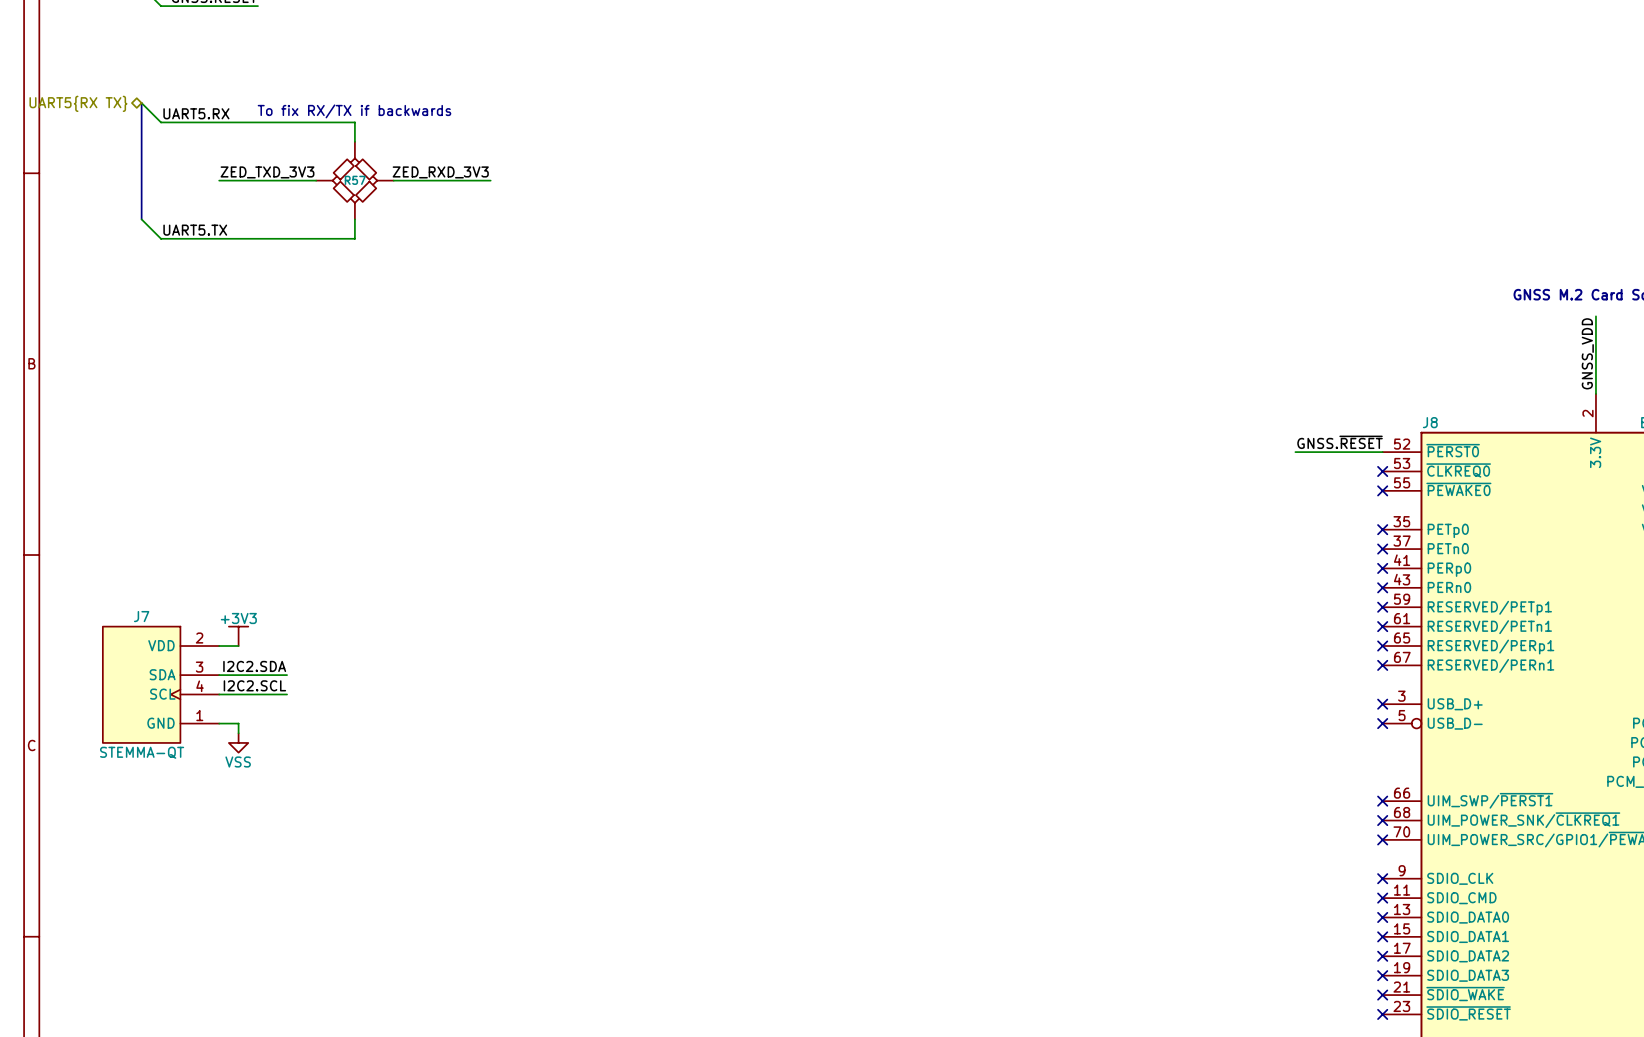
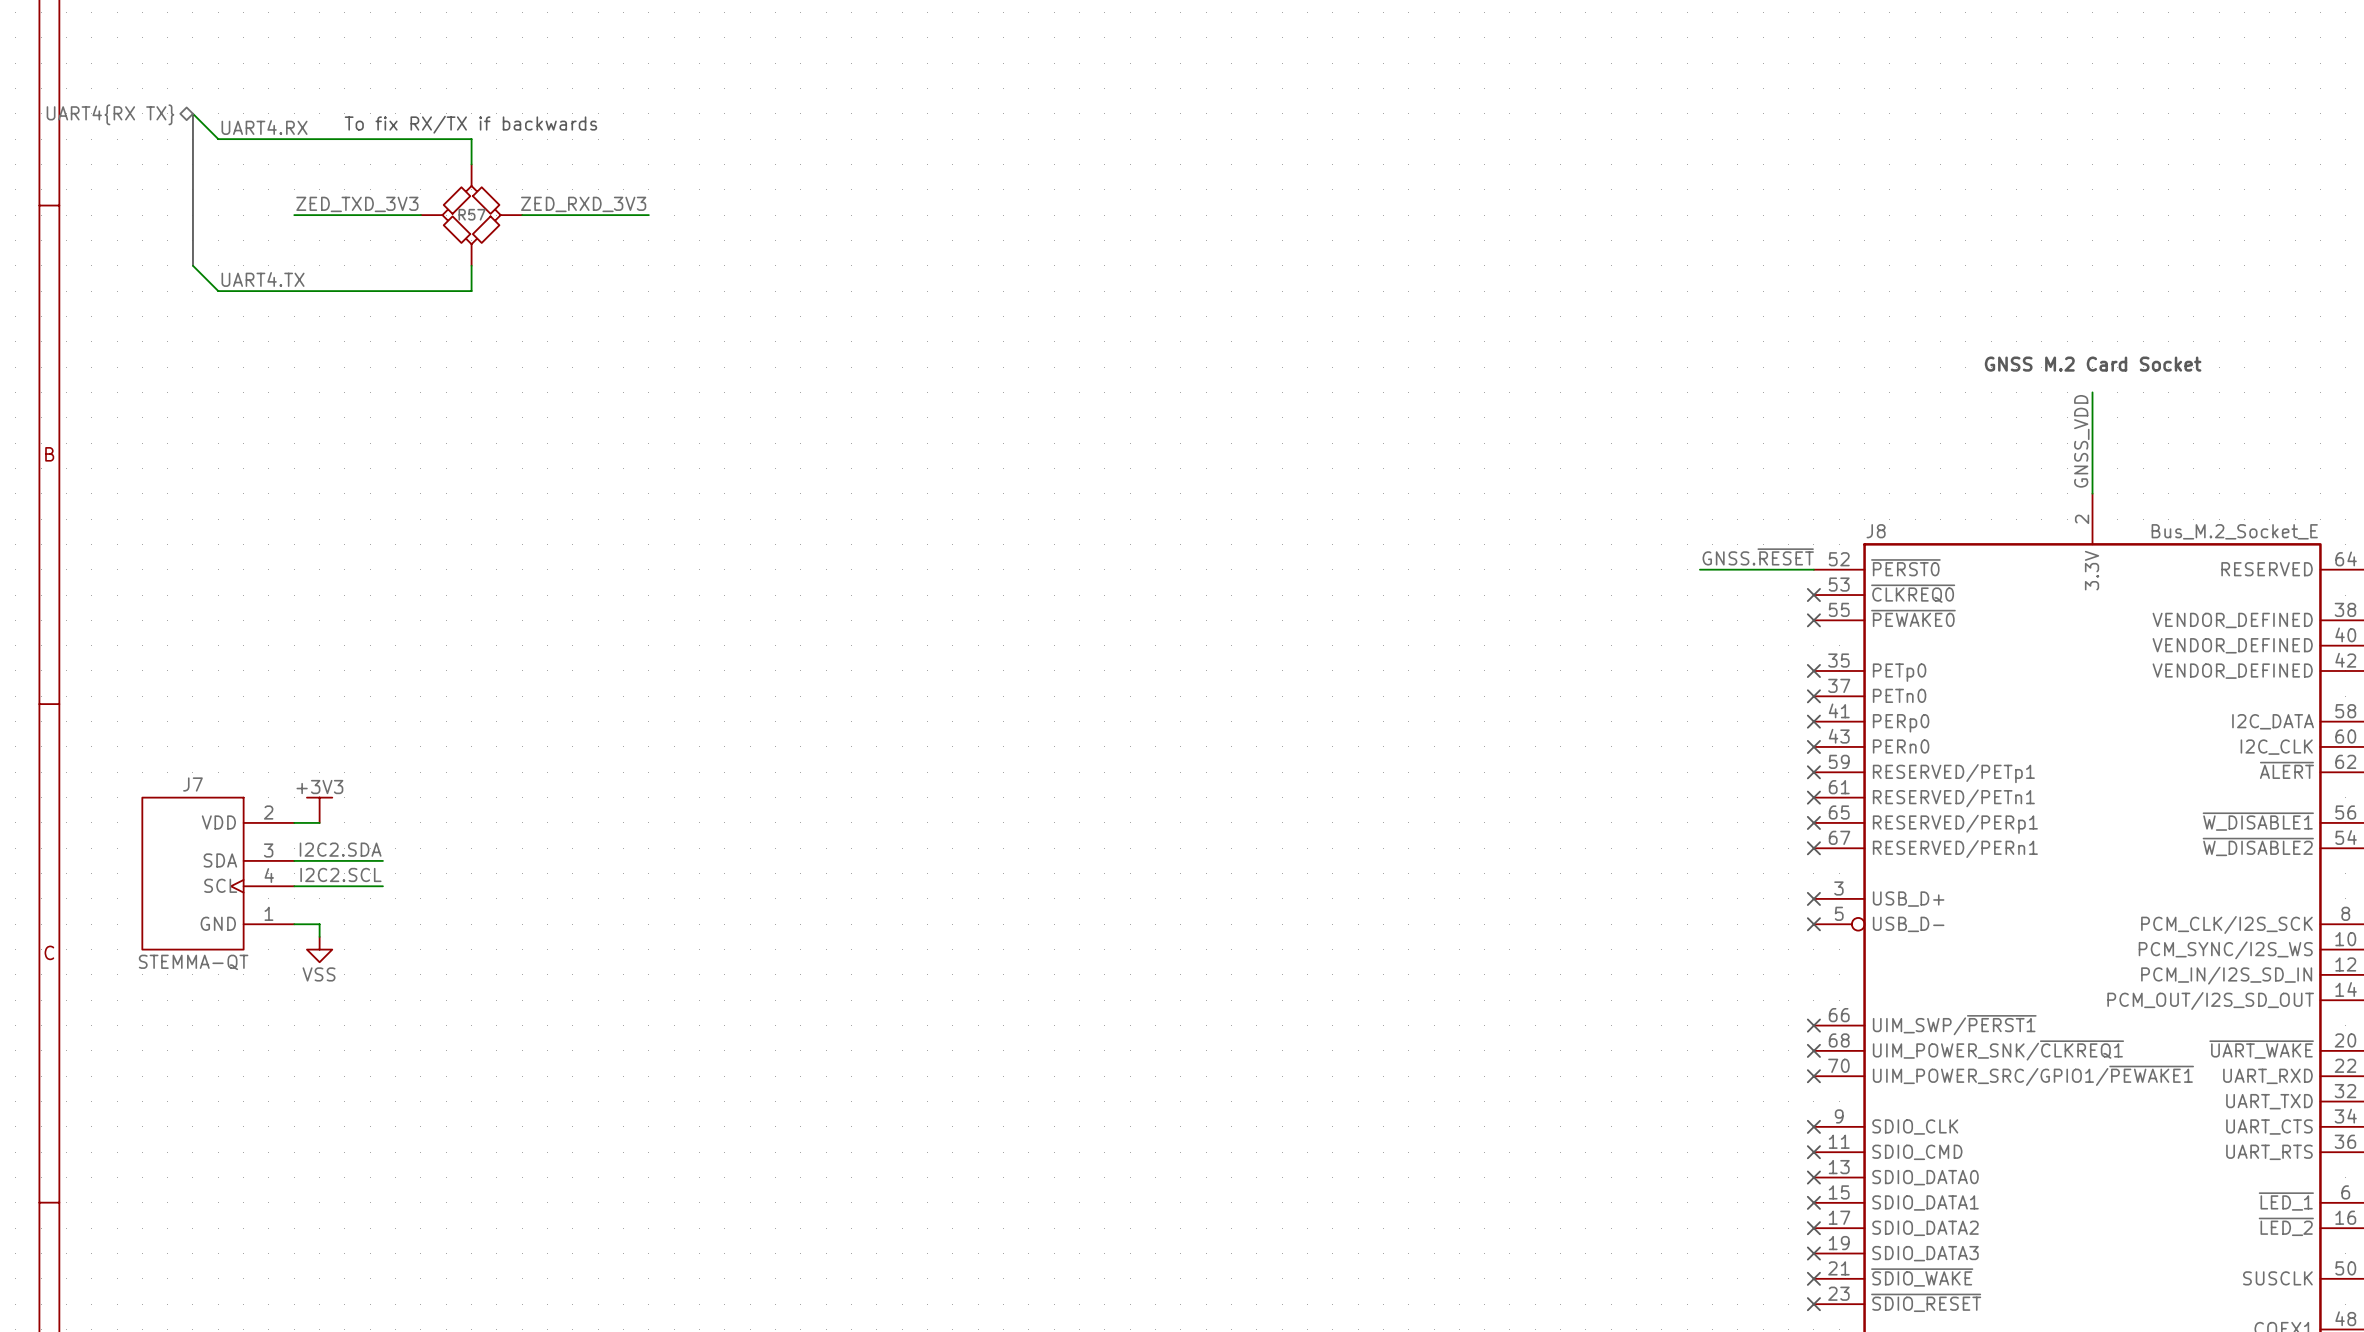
hierarchical label: UART5{RX TX} (78, 103) -> UART4{RX TX} (110, 114)
label: UART5.RX (196, 113) -> UART4.RX (264, 127)
label: UART5.TX (195, 230) -> UART4.TX (263, 279)

